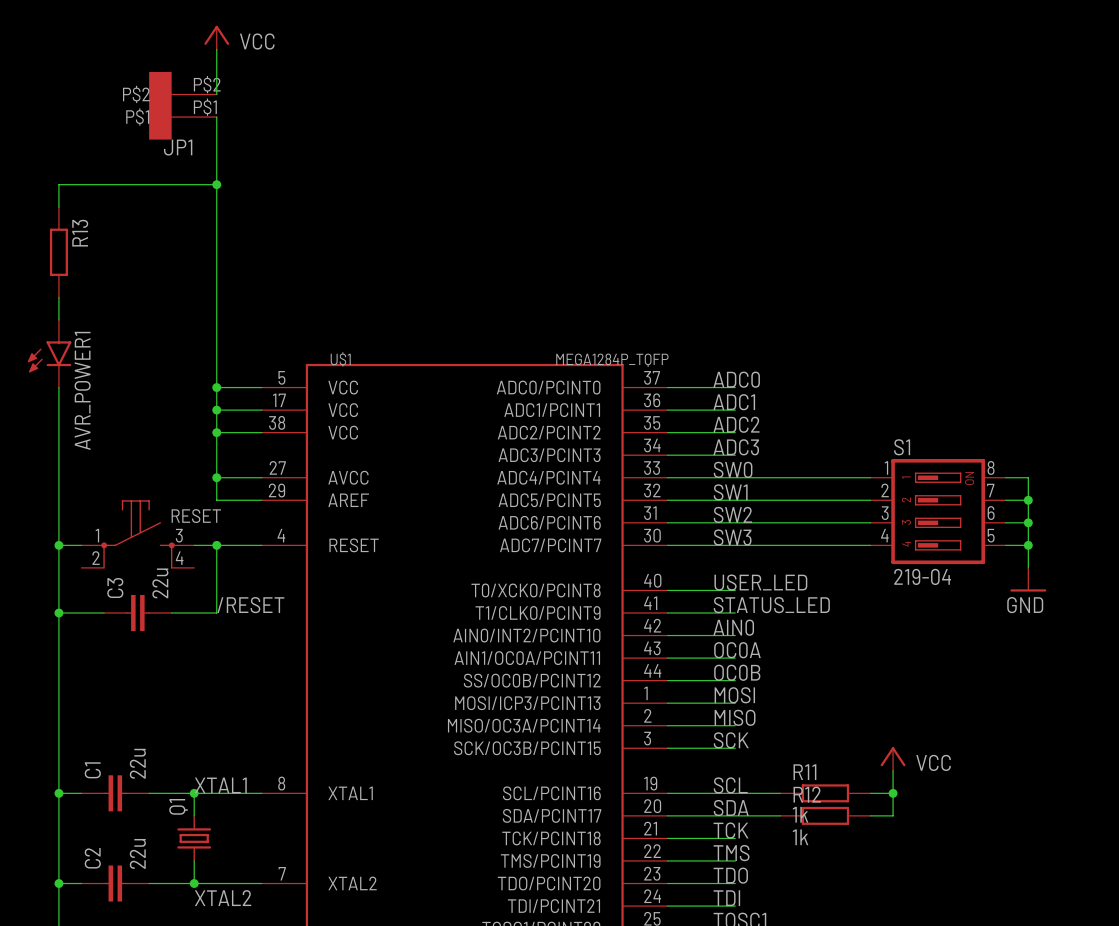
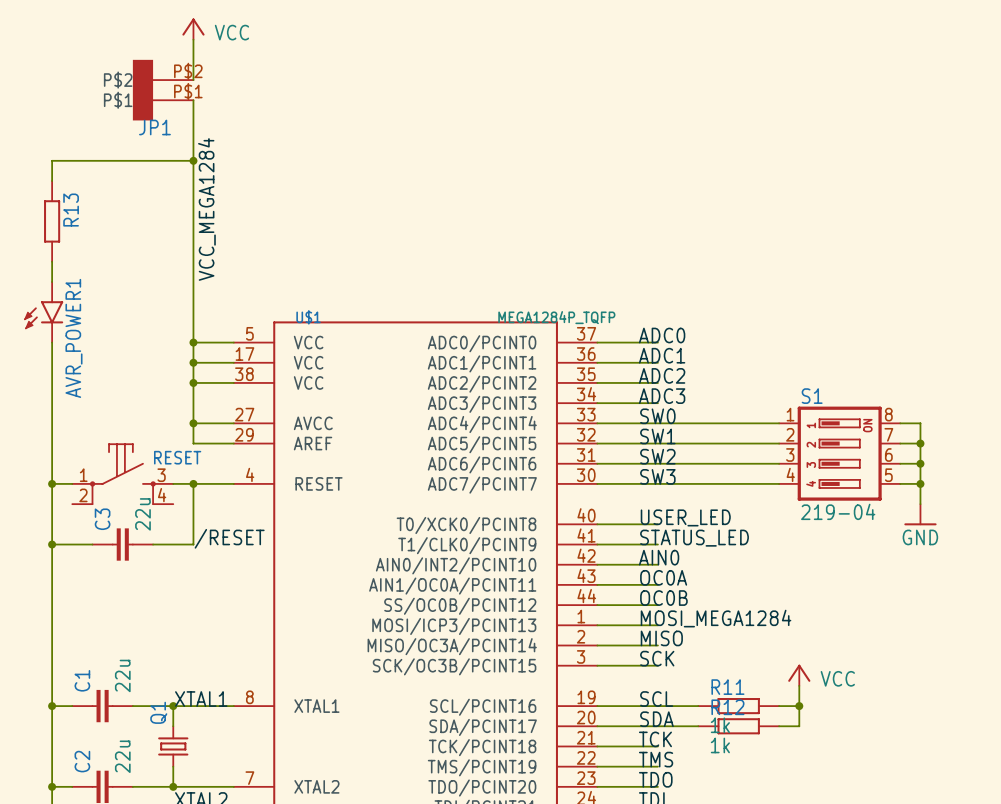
label: none -> VCC_MEGA1284 (206, 209)
label: MOSI (734, 695) -> MOSI_MEGA1284 (716, 618)

